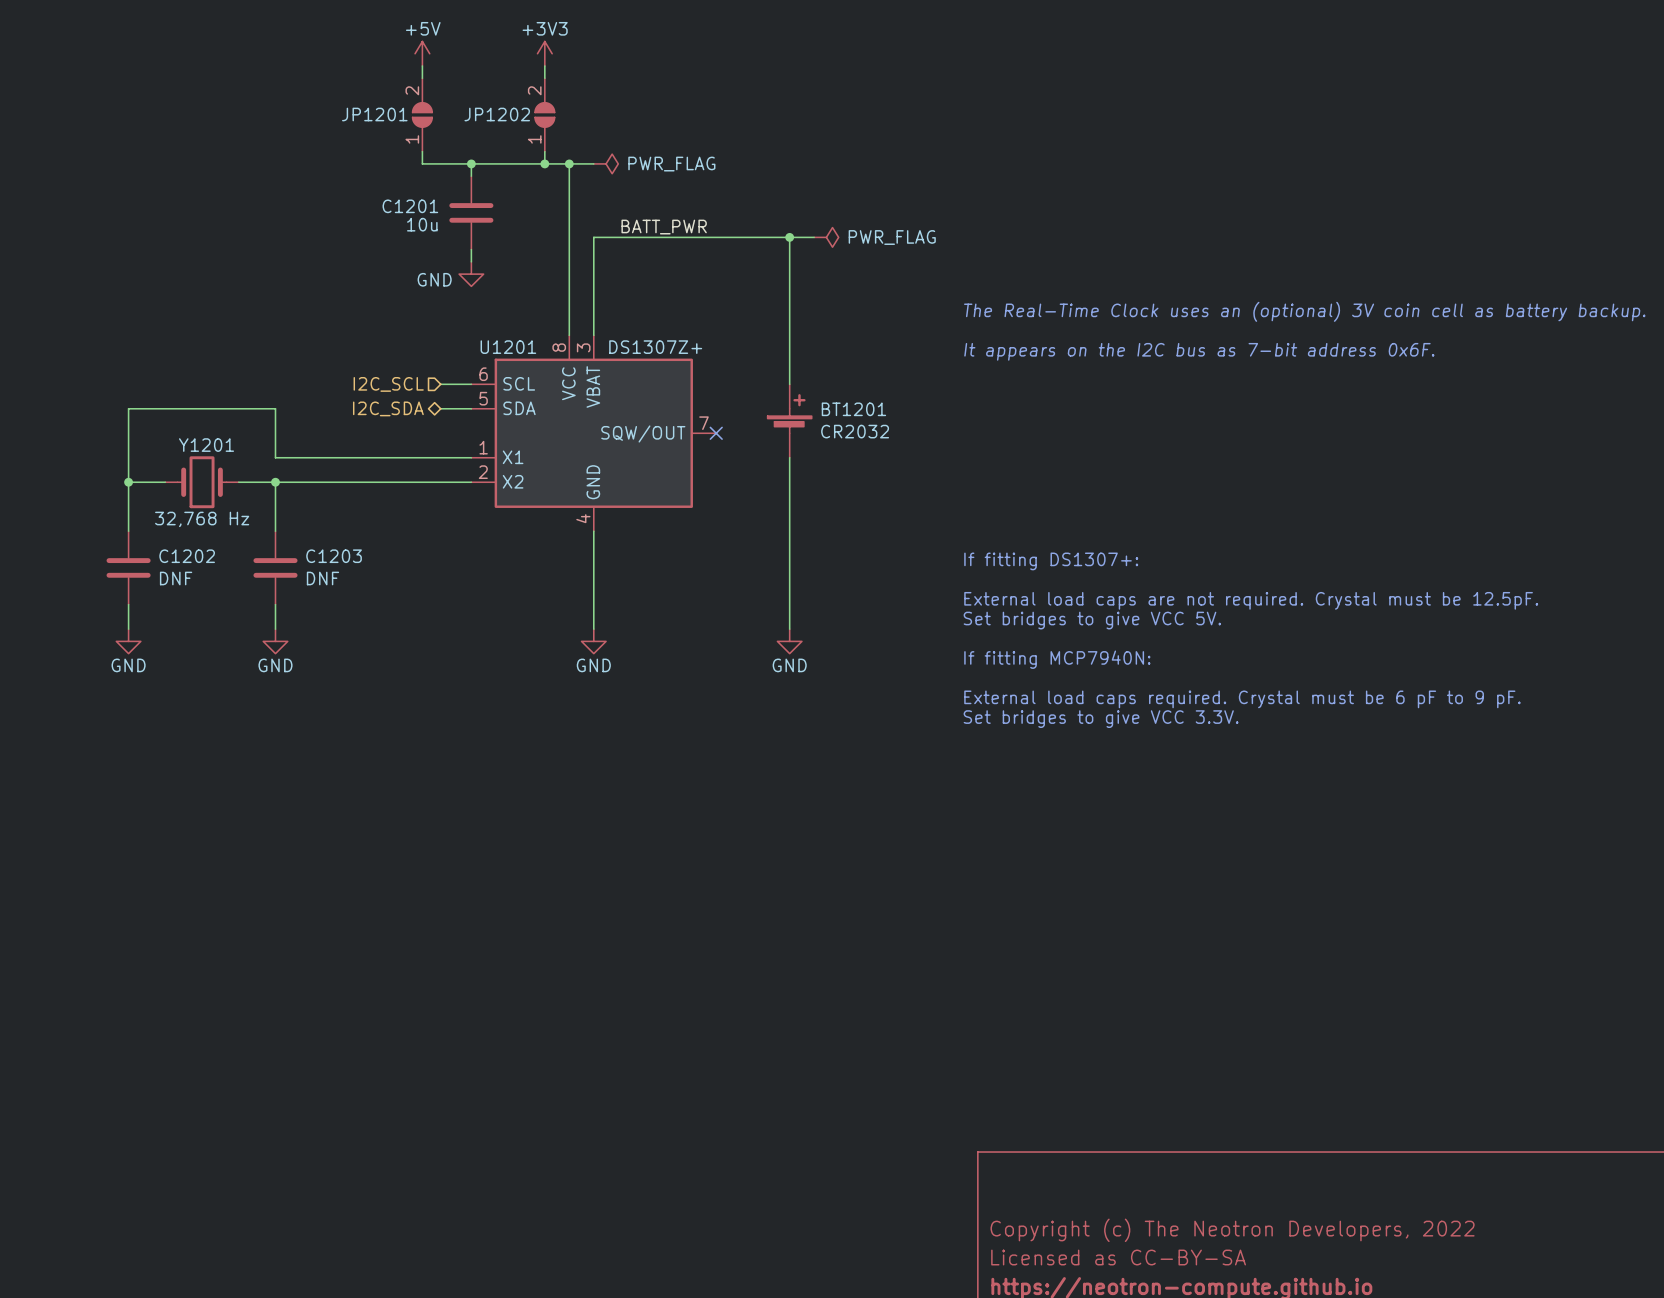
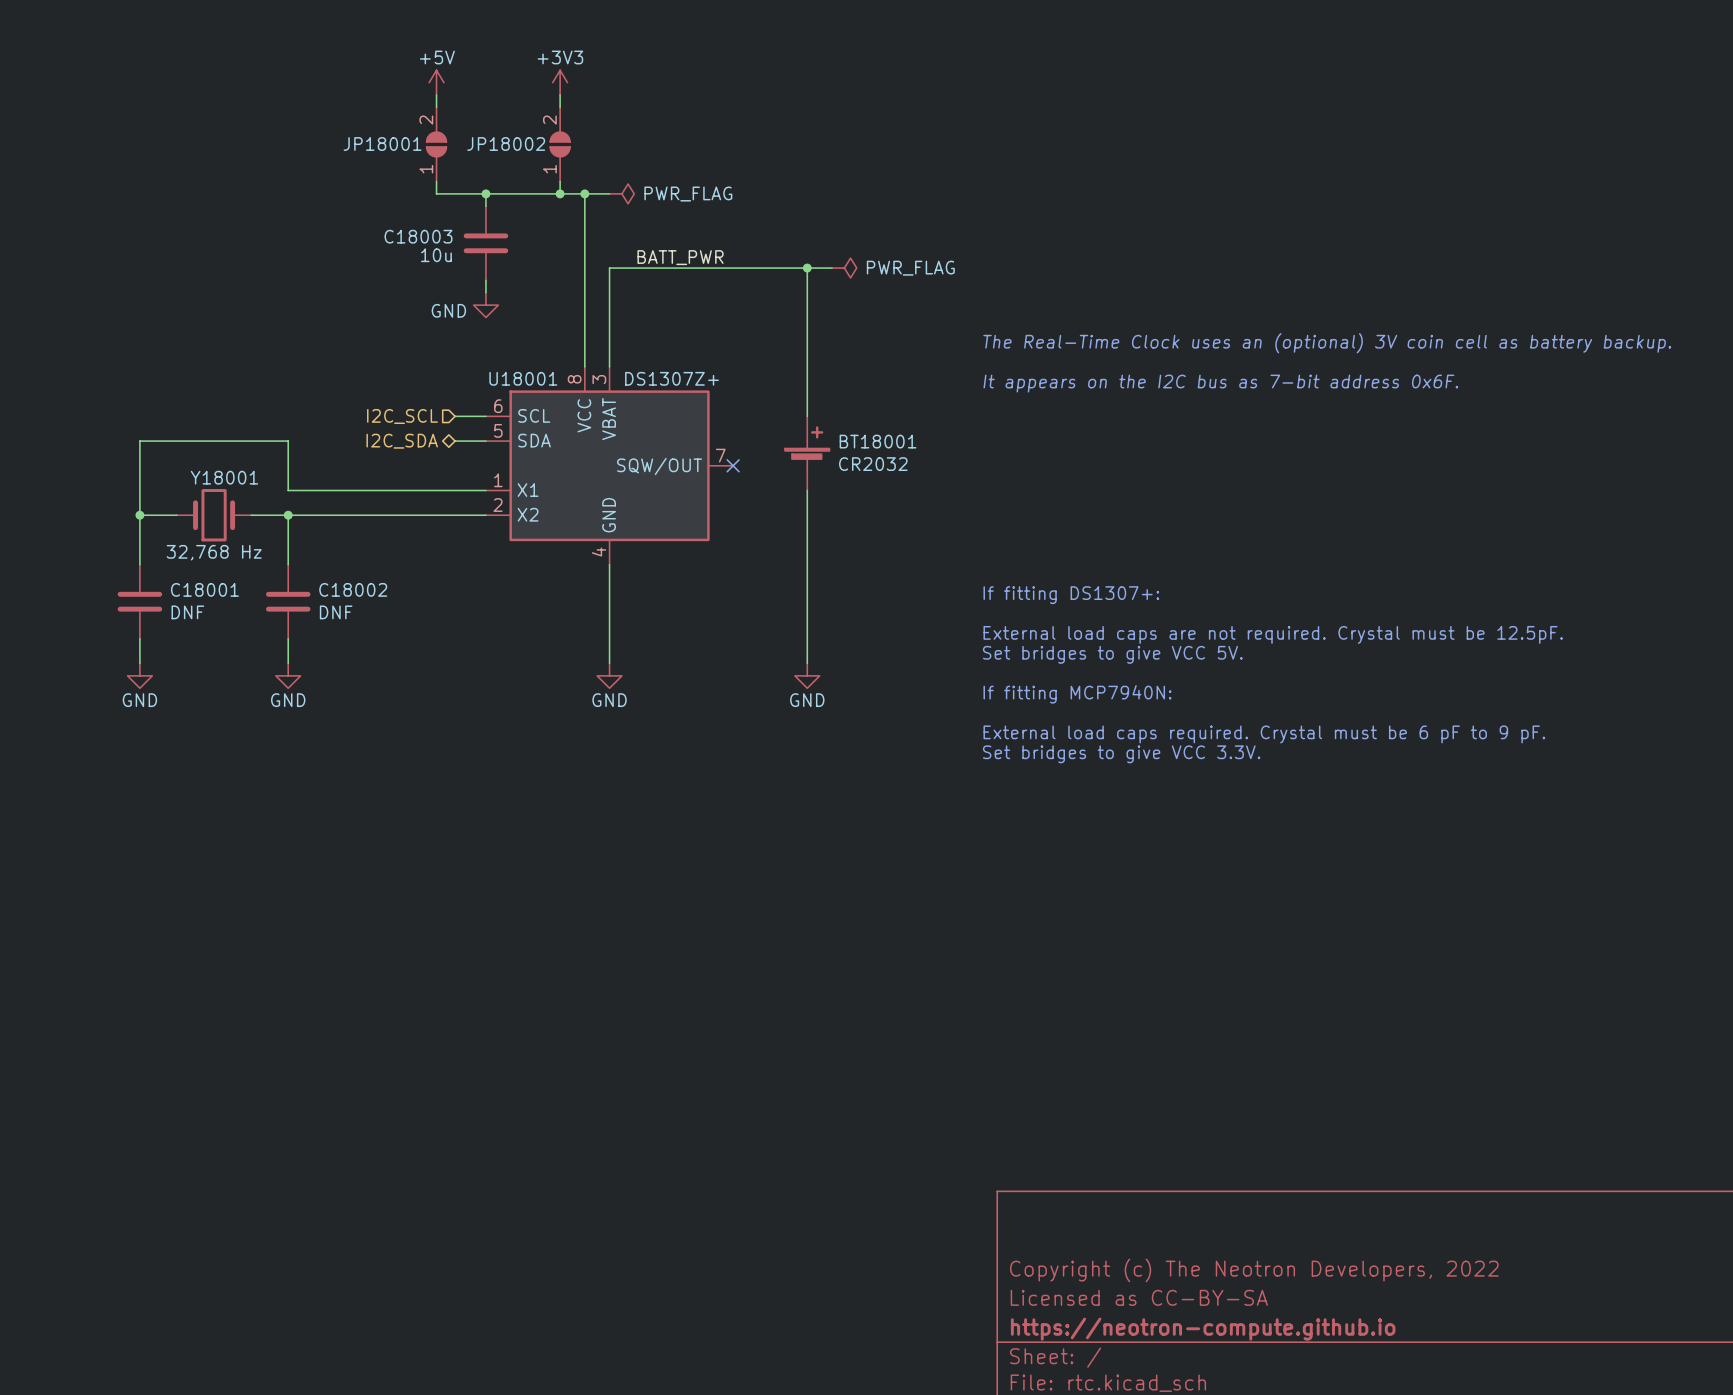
JP1201 name: JP1201 (374, 114) -> JP18001 (382, 144)
JP1202 name: JP1202 (497, 114) -> JP18002 (506, 144)
C1201 name: C1201 (410, 206) -> C18003 (418, 236)
U1201 name: U1201 (508, 347) -> U18001 (523, 378)
BT1201 name: BT1201 (853, 409) -> BT18001 (878, 441)
Y1201 name: Y1201 (206, 445) -> Y18001 (224, 477)
C1202 name: C1202 (187, 556) -> C18001 (204, 589)
C1203 name: C1203 (334, 556) -> C18002 (353, 589)

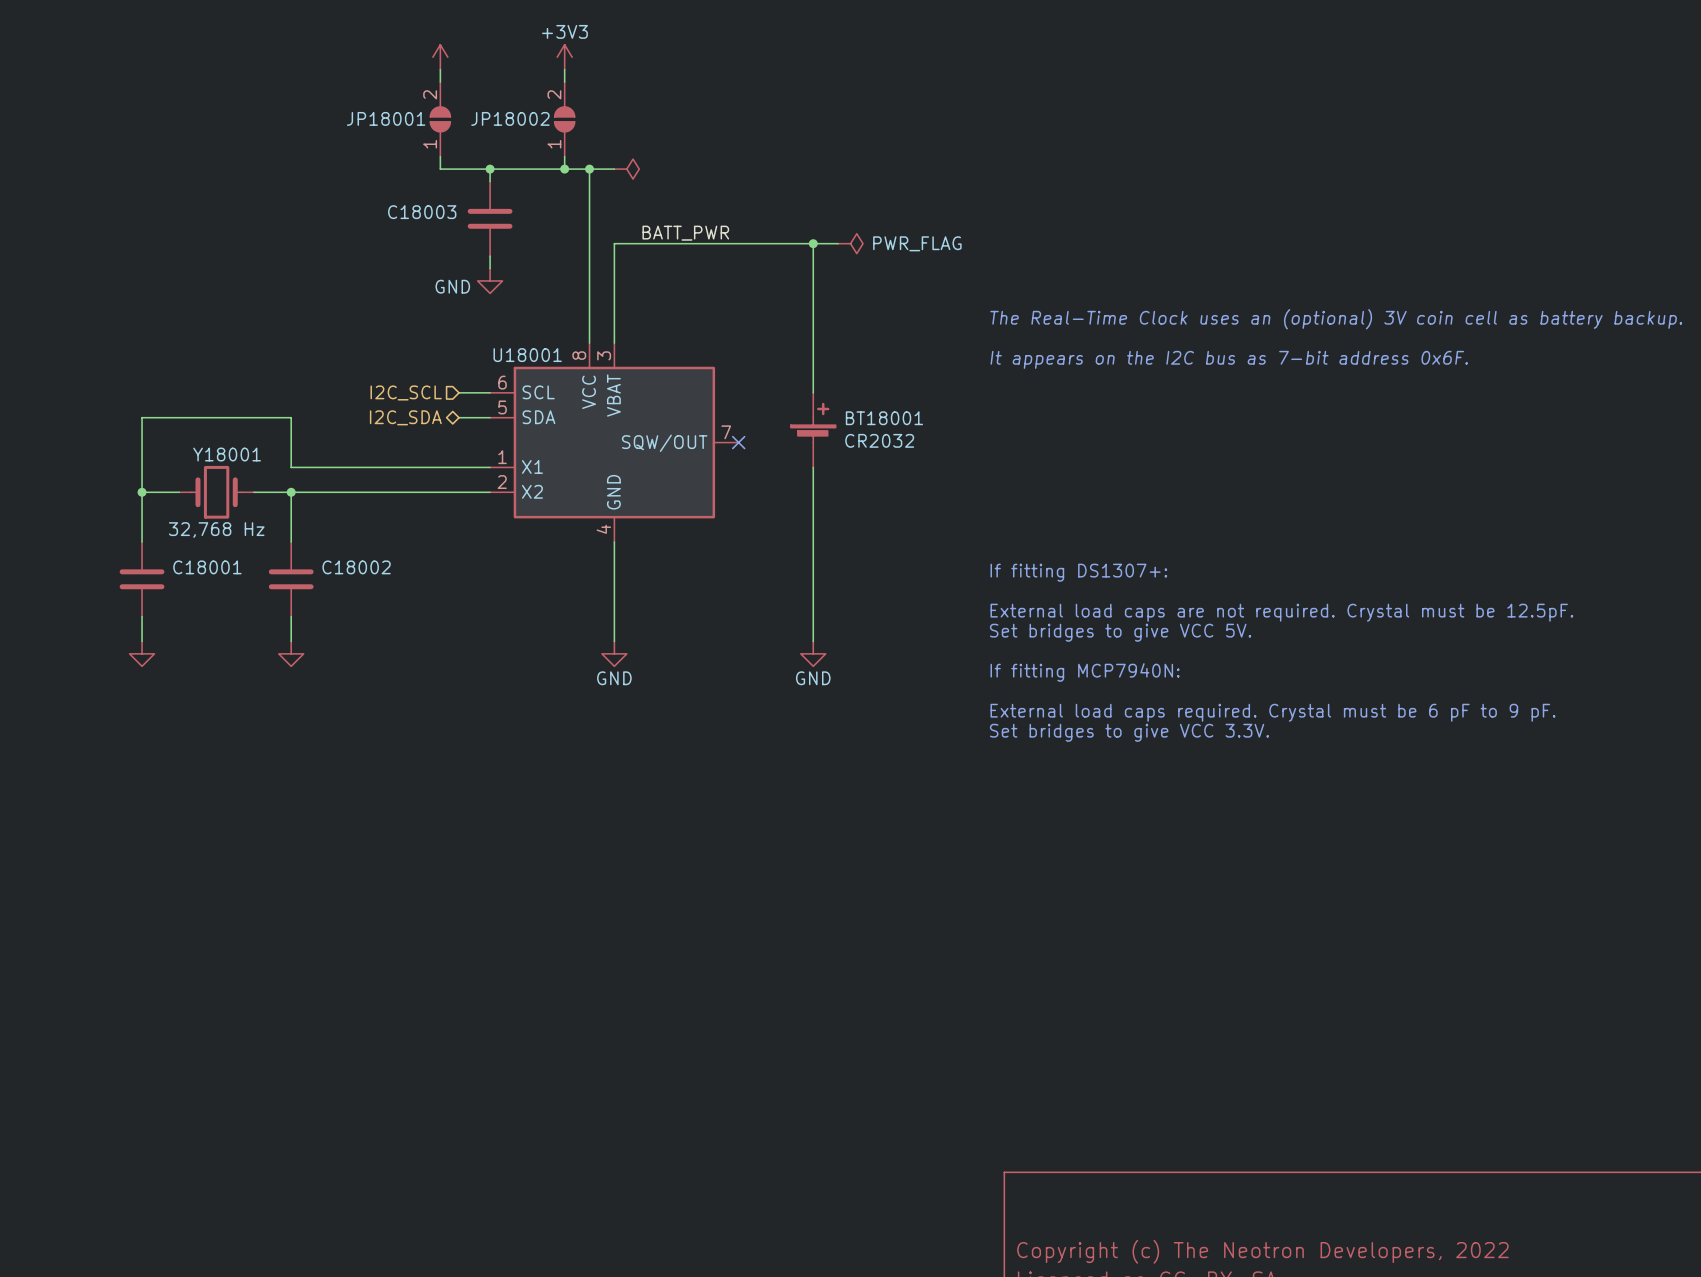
power symbol text: +5V (437, 57) -> none
power symbol text: PWR_FLAG (688, 194) -> none
C18003 value: 10u (436, 255) -> none
U18001 value: DS1307Z+ (672, 378) -> none
C18001 value: DNF (187, 612) -> none
C18002 value: DNF (336, 612) -> none
power symbol text: GND (139, 700) -> none
power symbol text: GND (288, 700) -> none

